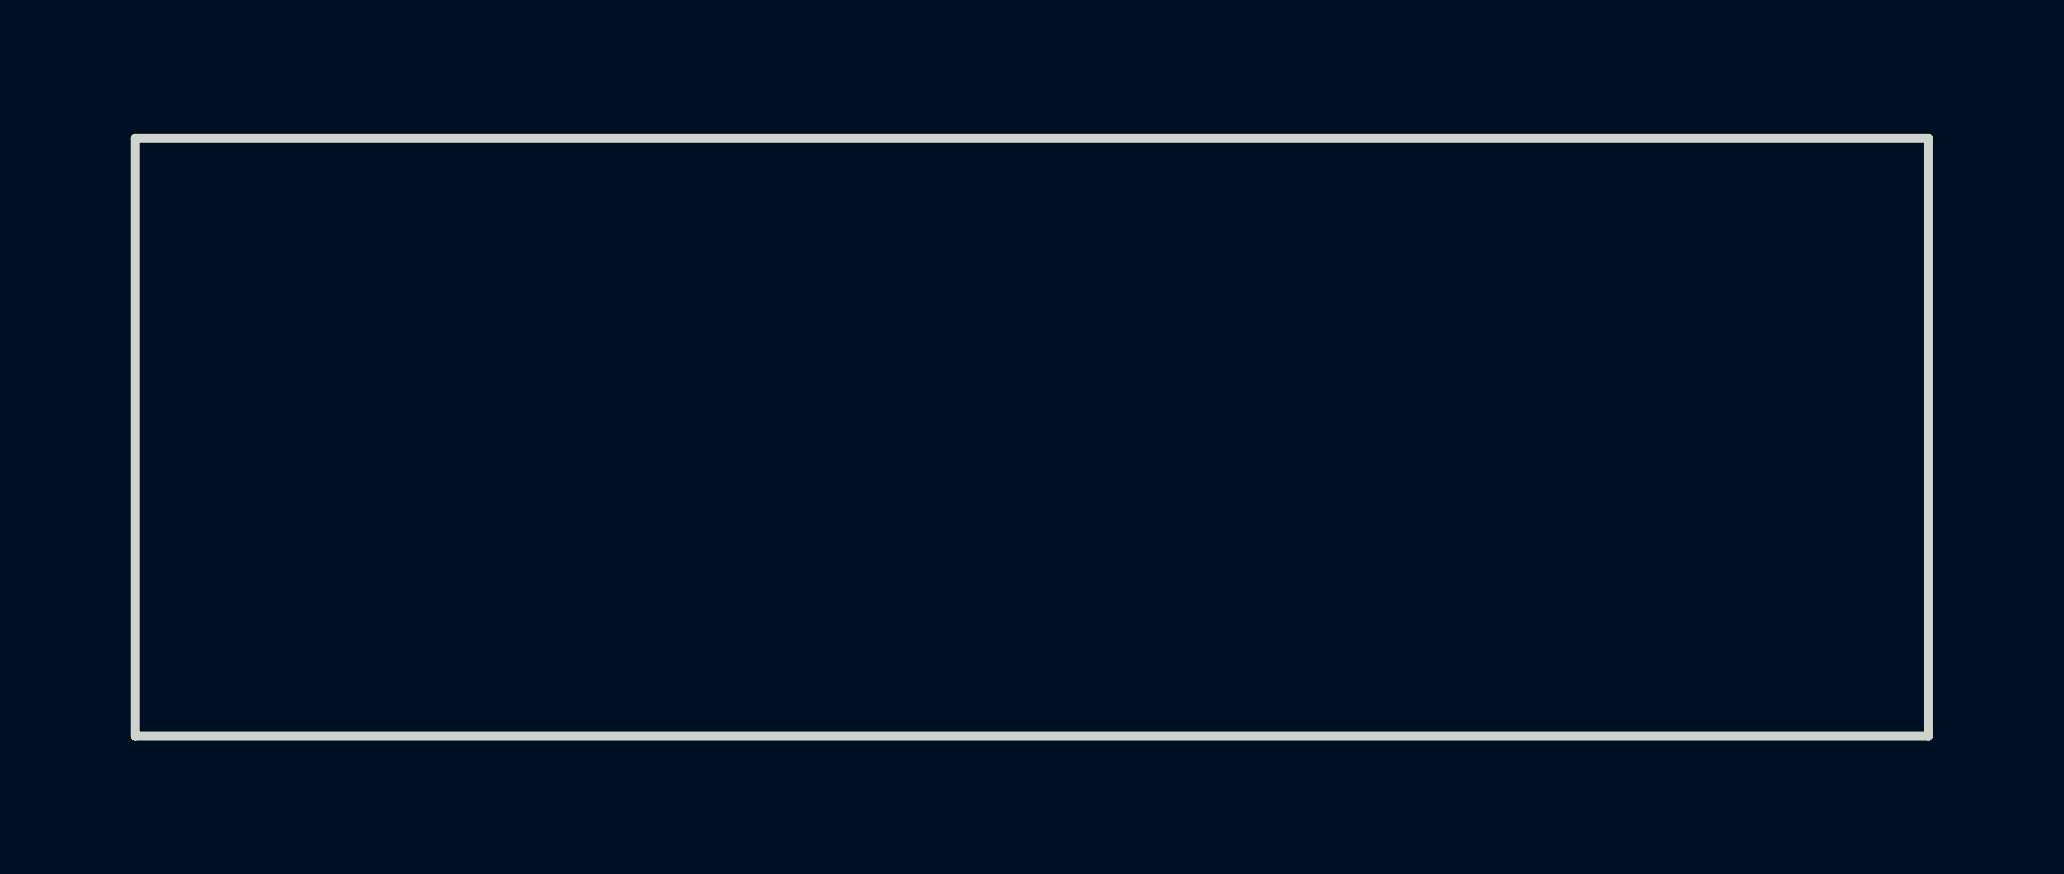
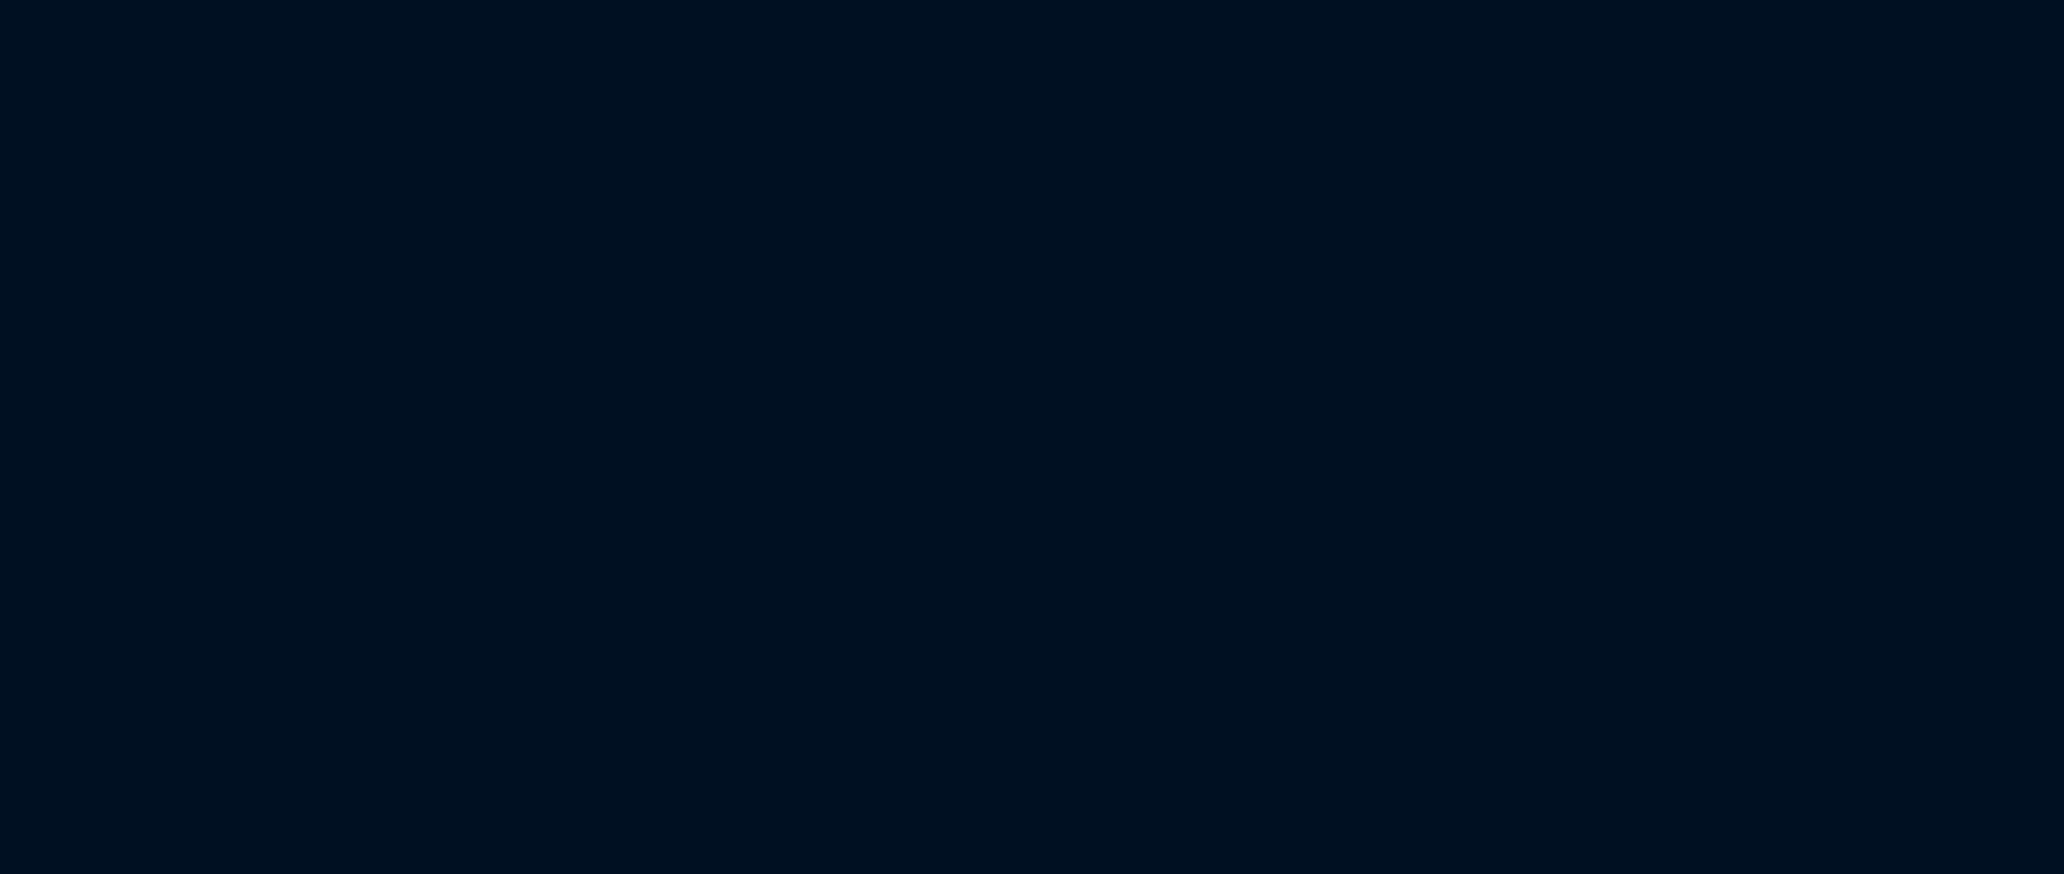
board edge: (1928, 138) (1928, 736) (135, 736) (135, 138) (1928, 138) -> none

